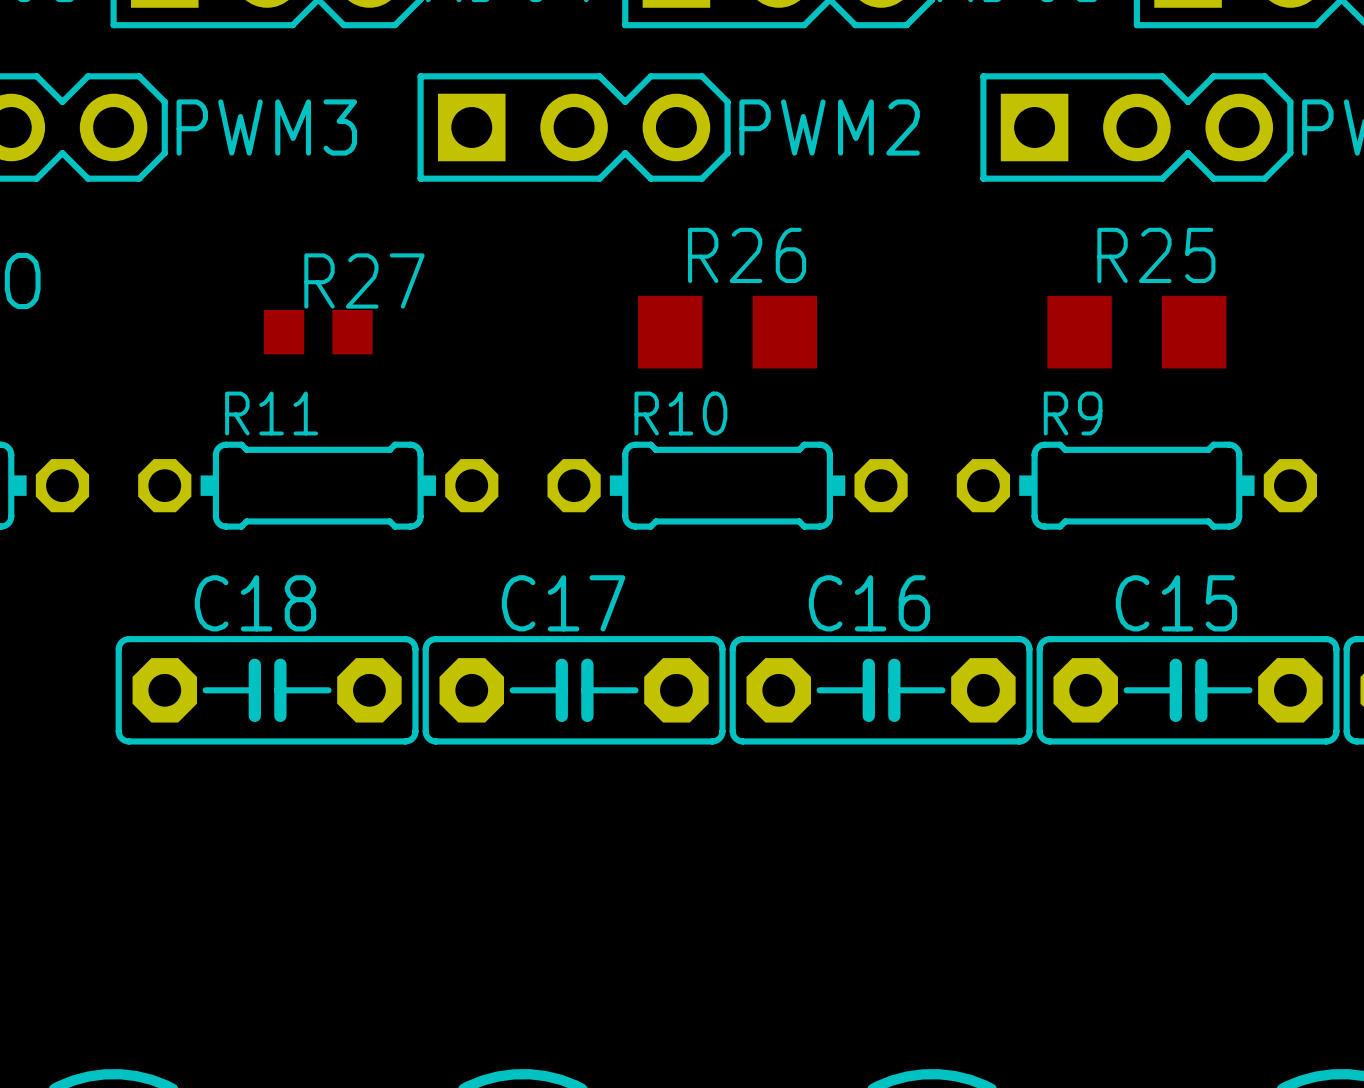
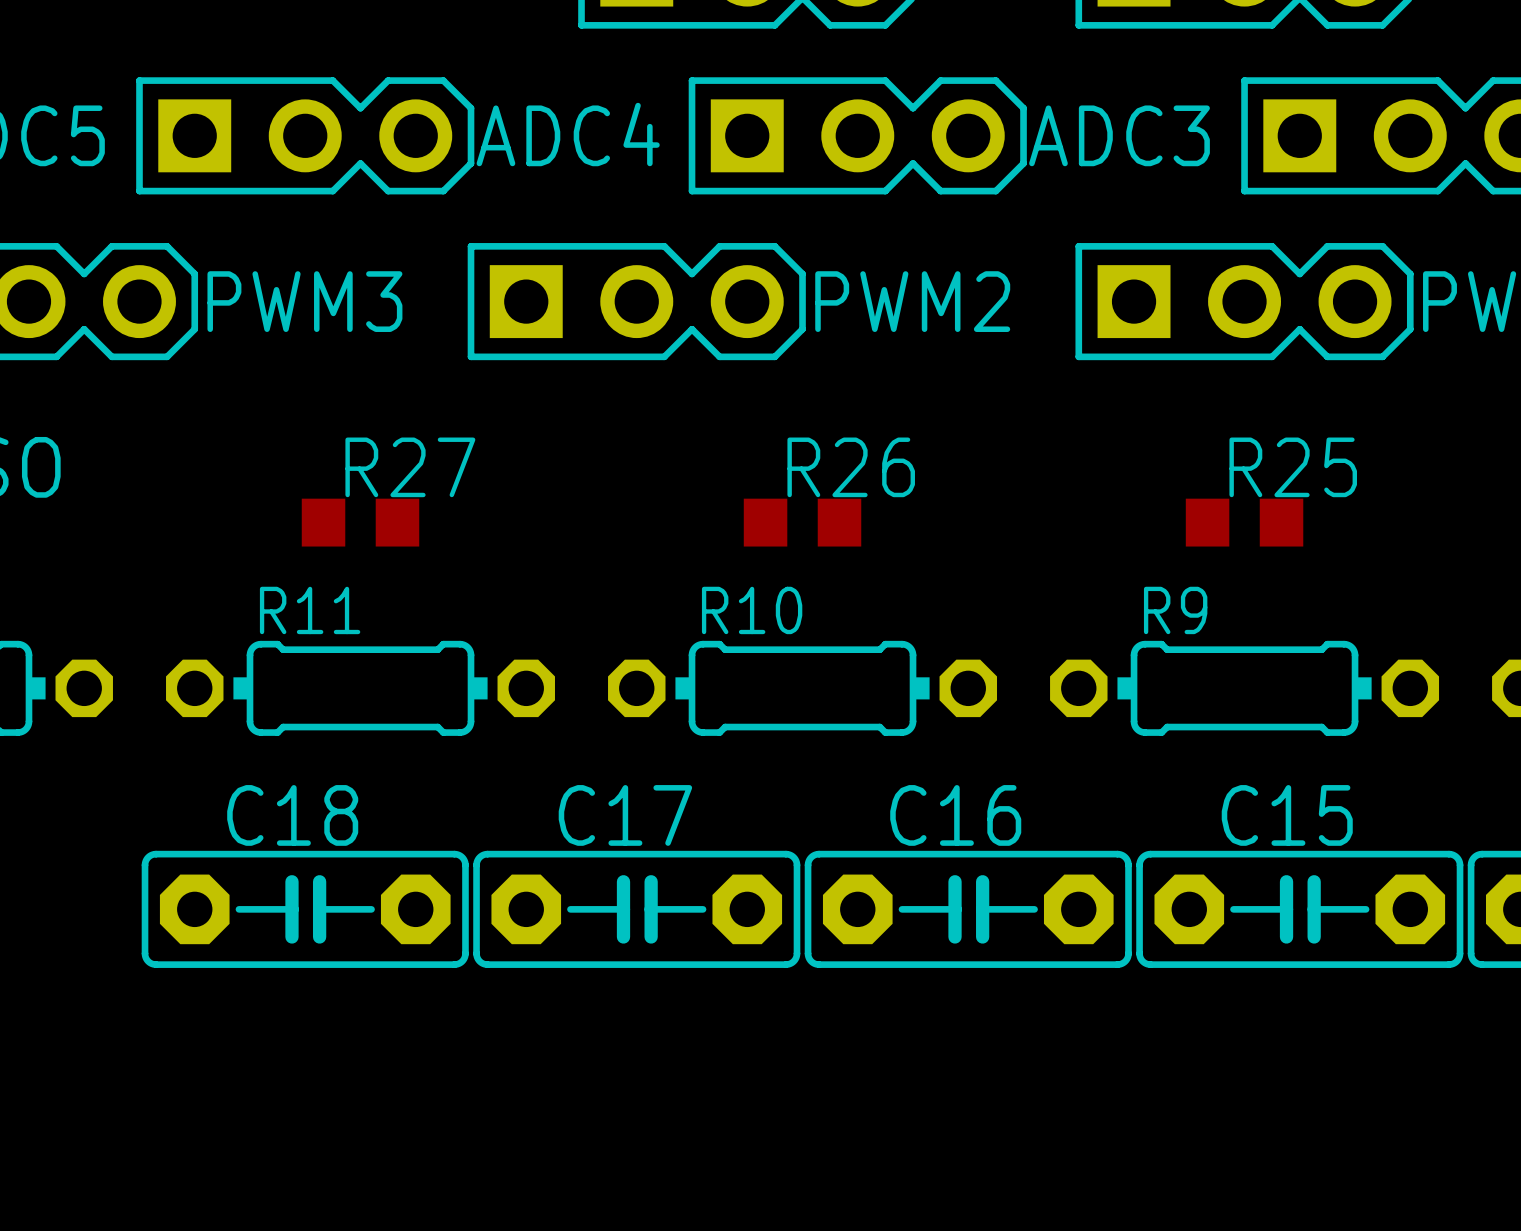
R26 name position: R26 (747, 255) -> R26 (851, 467)
R25 name position: R25 (1156, 255) -> R25 (1293, 467)
R26 footprint: [638, 295, 818, 369] -> [743, 498, 862, 547]
R25 footprint: [1047, 295, 1227, 369] -> [1185, 498, 1304, 547]

